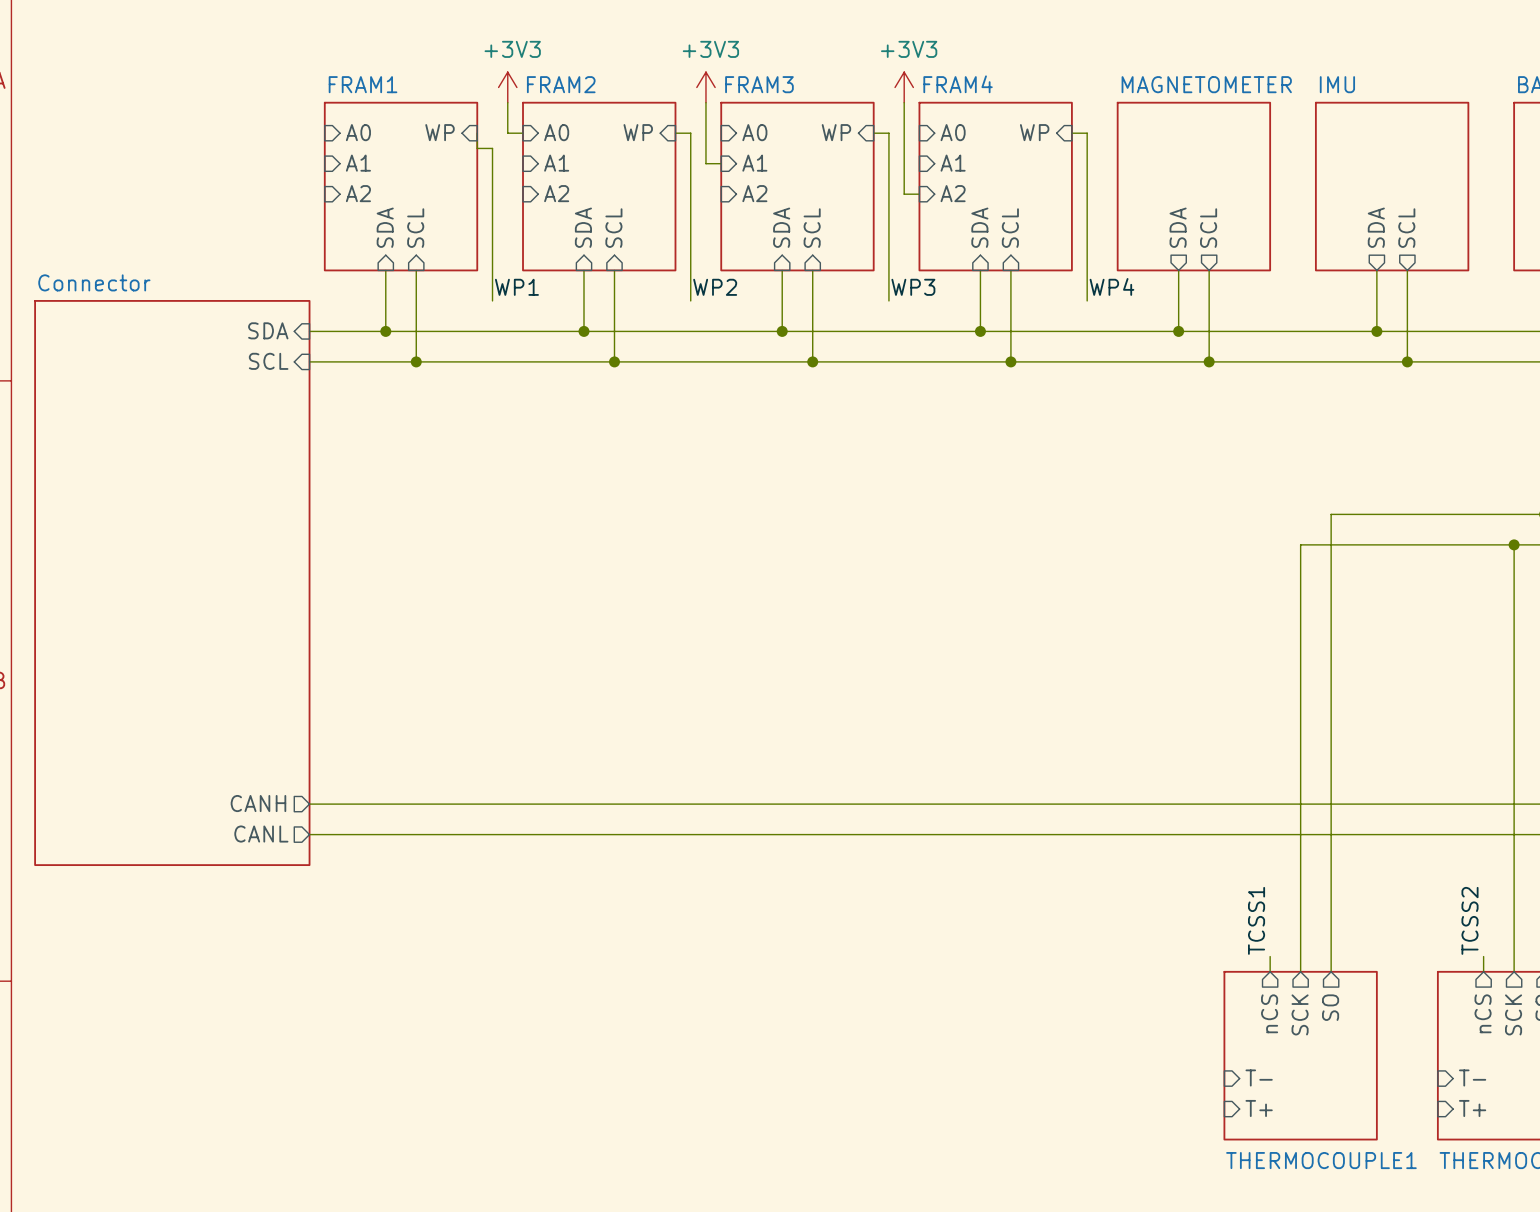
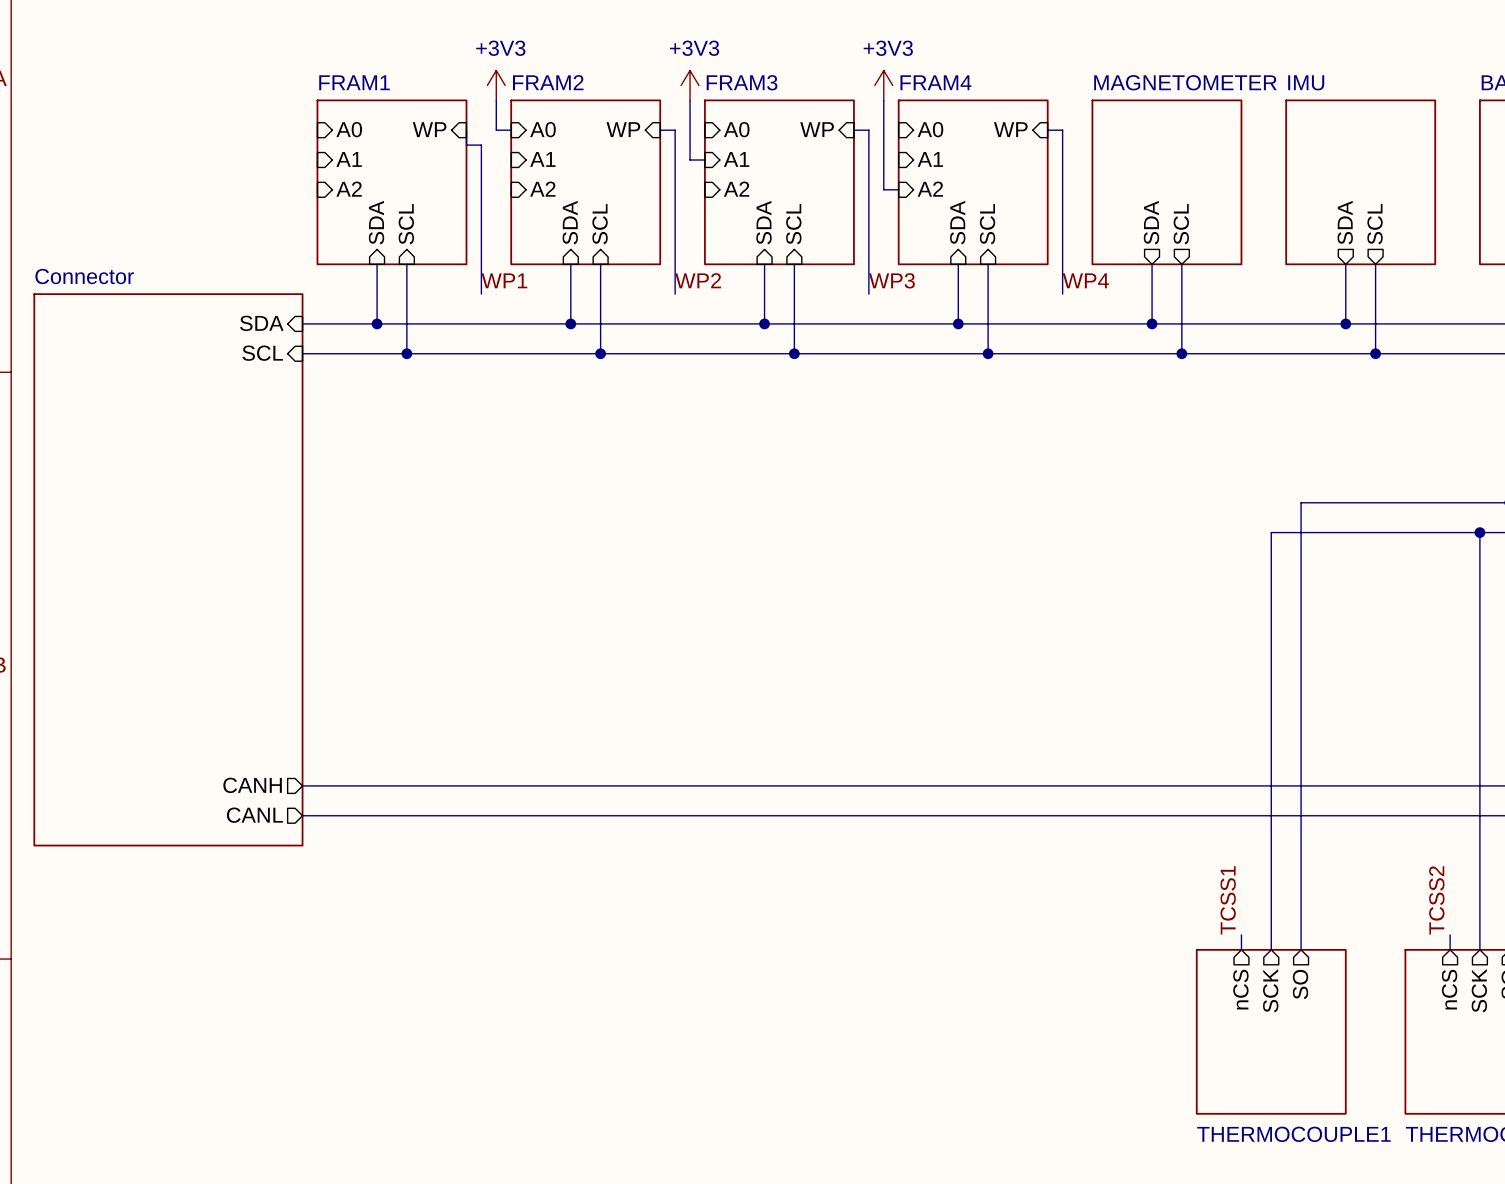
sheet pin: T- (1259, 1077) -> none
sheet pin: T- (1472, 1077) -> none
sheet pin: T+ (1259, 1108) -> none
sheet pin: T+ (1472, 1108) -> none

